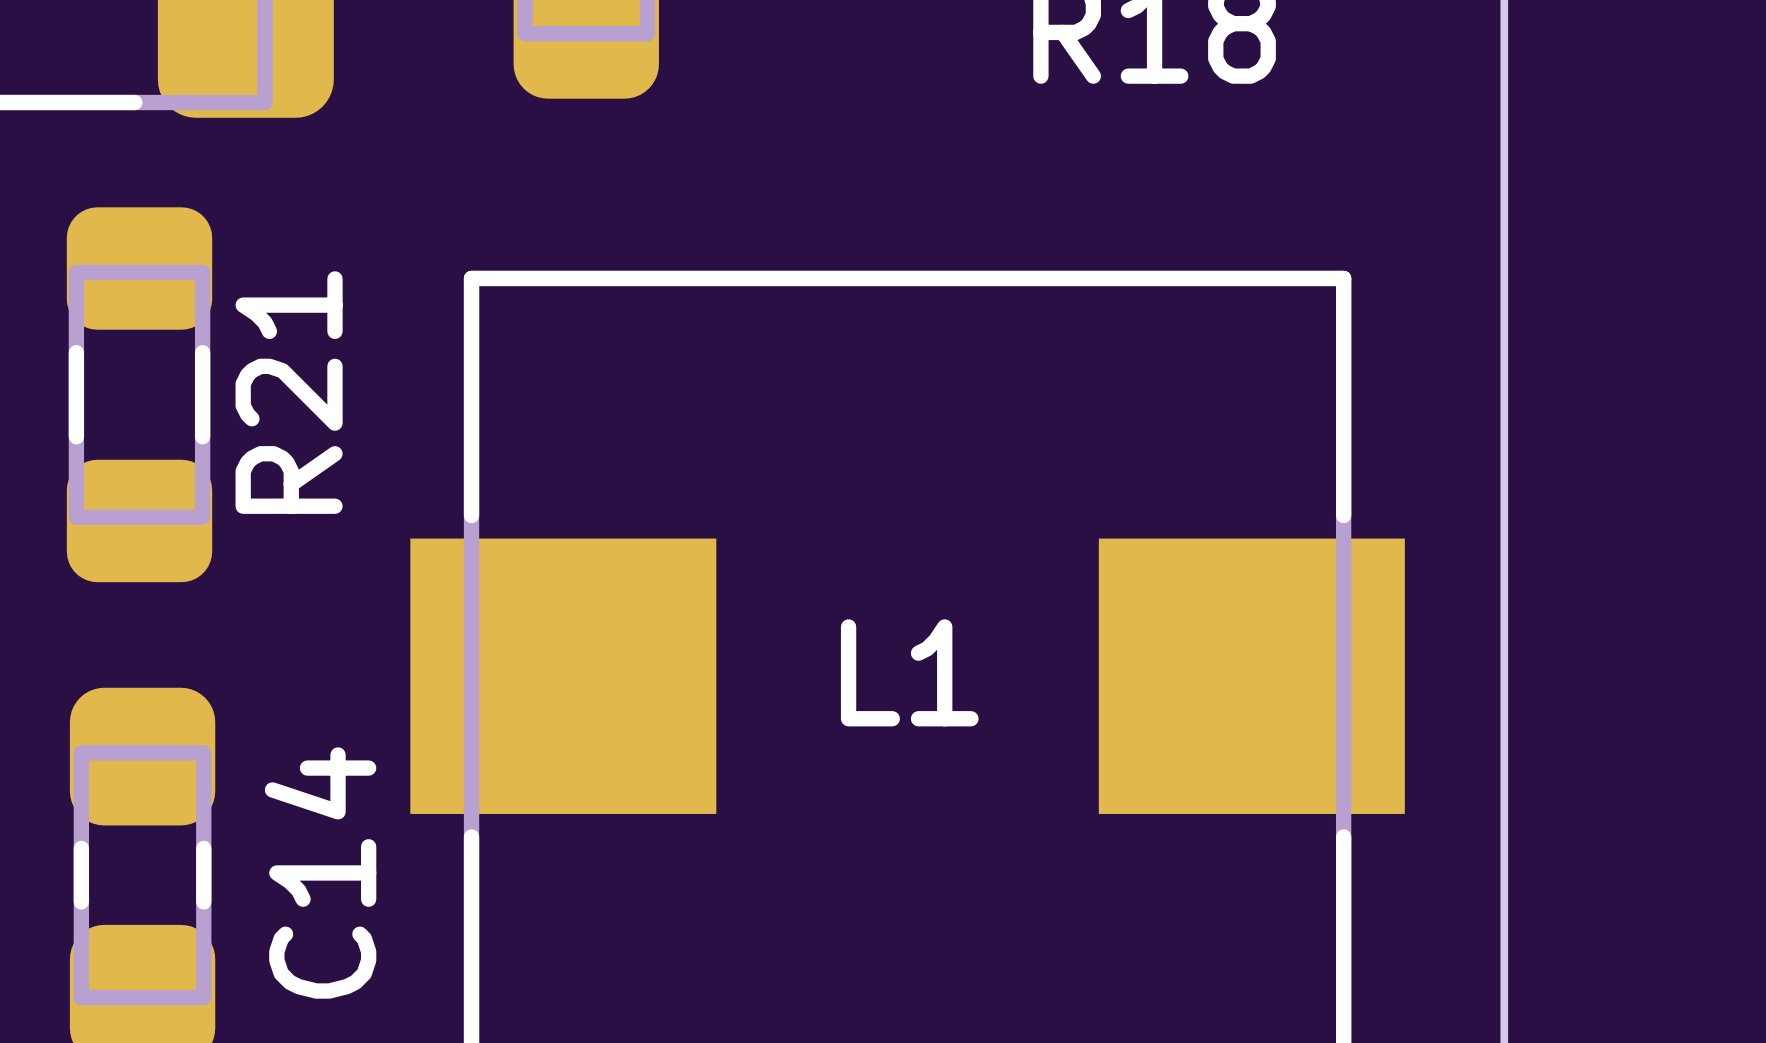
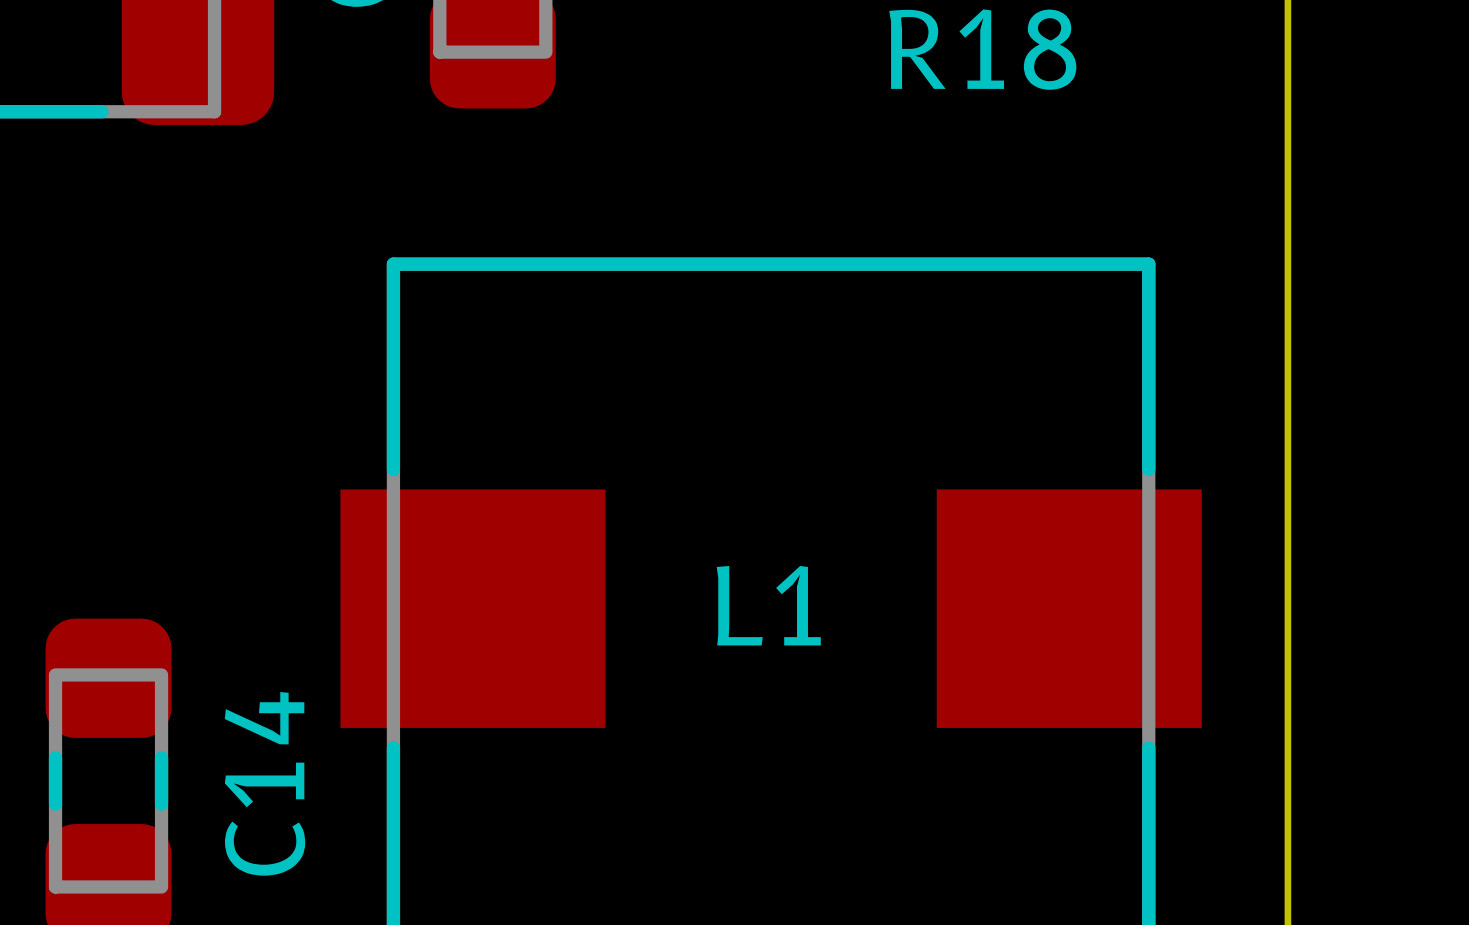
line: (76, 352) (76, 436) -> none
line: (202, 352) (202, 436) -> none
R21: (139, 394) -> none

